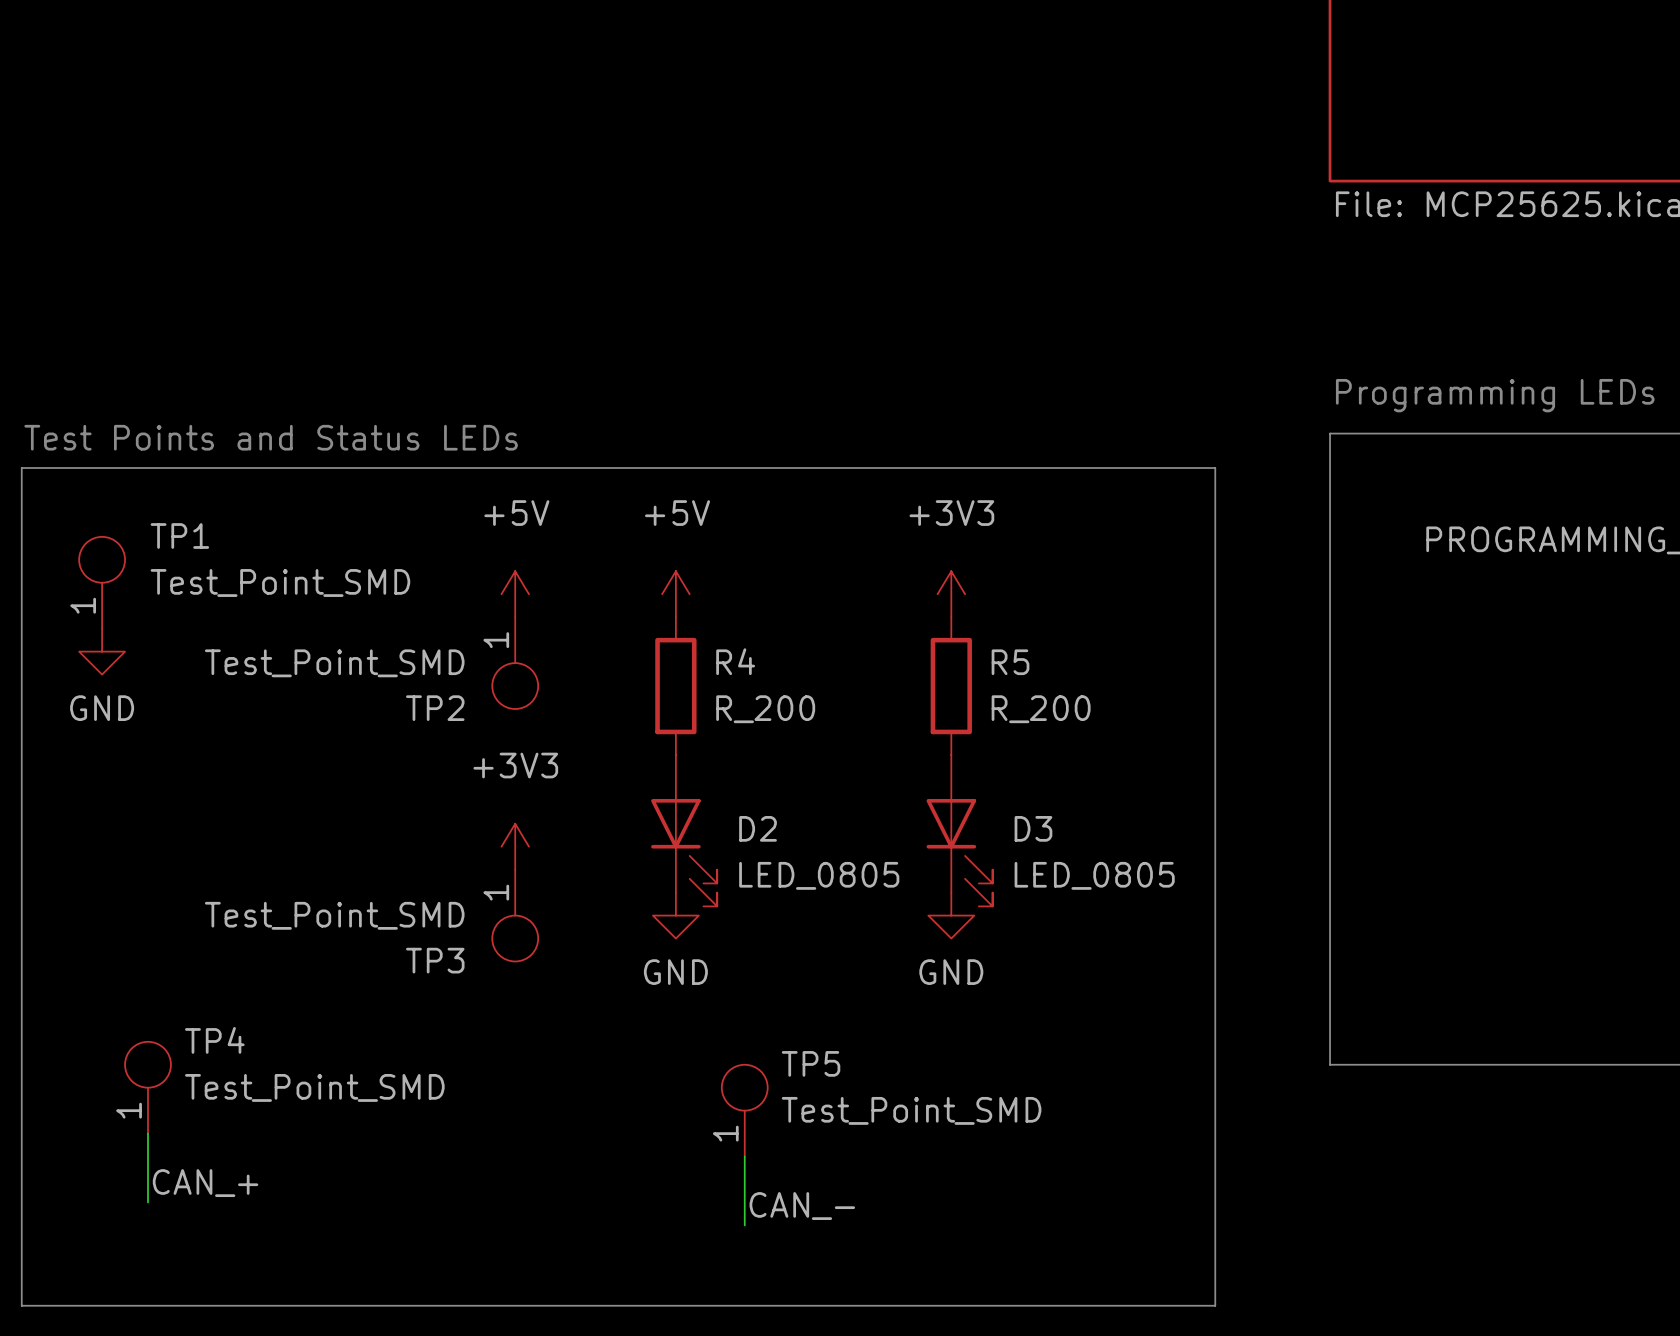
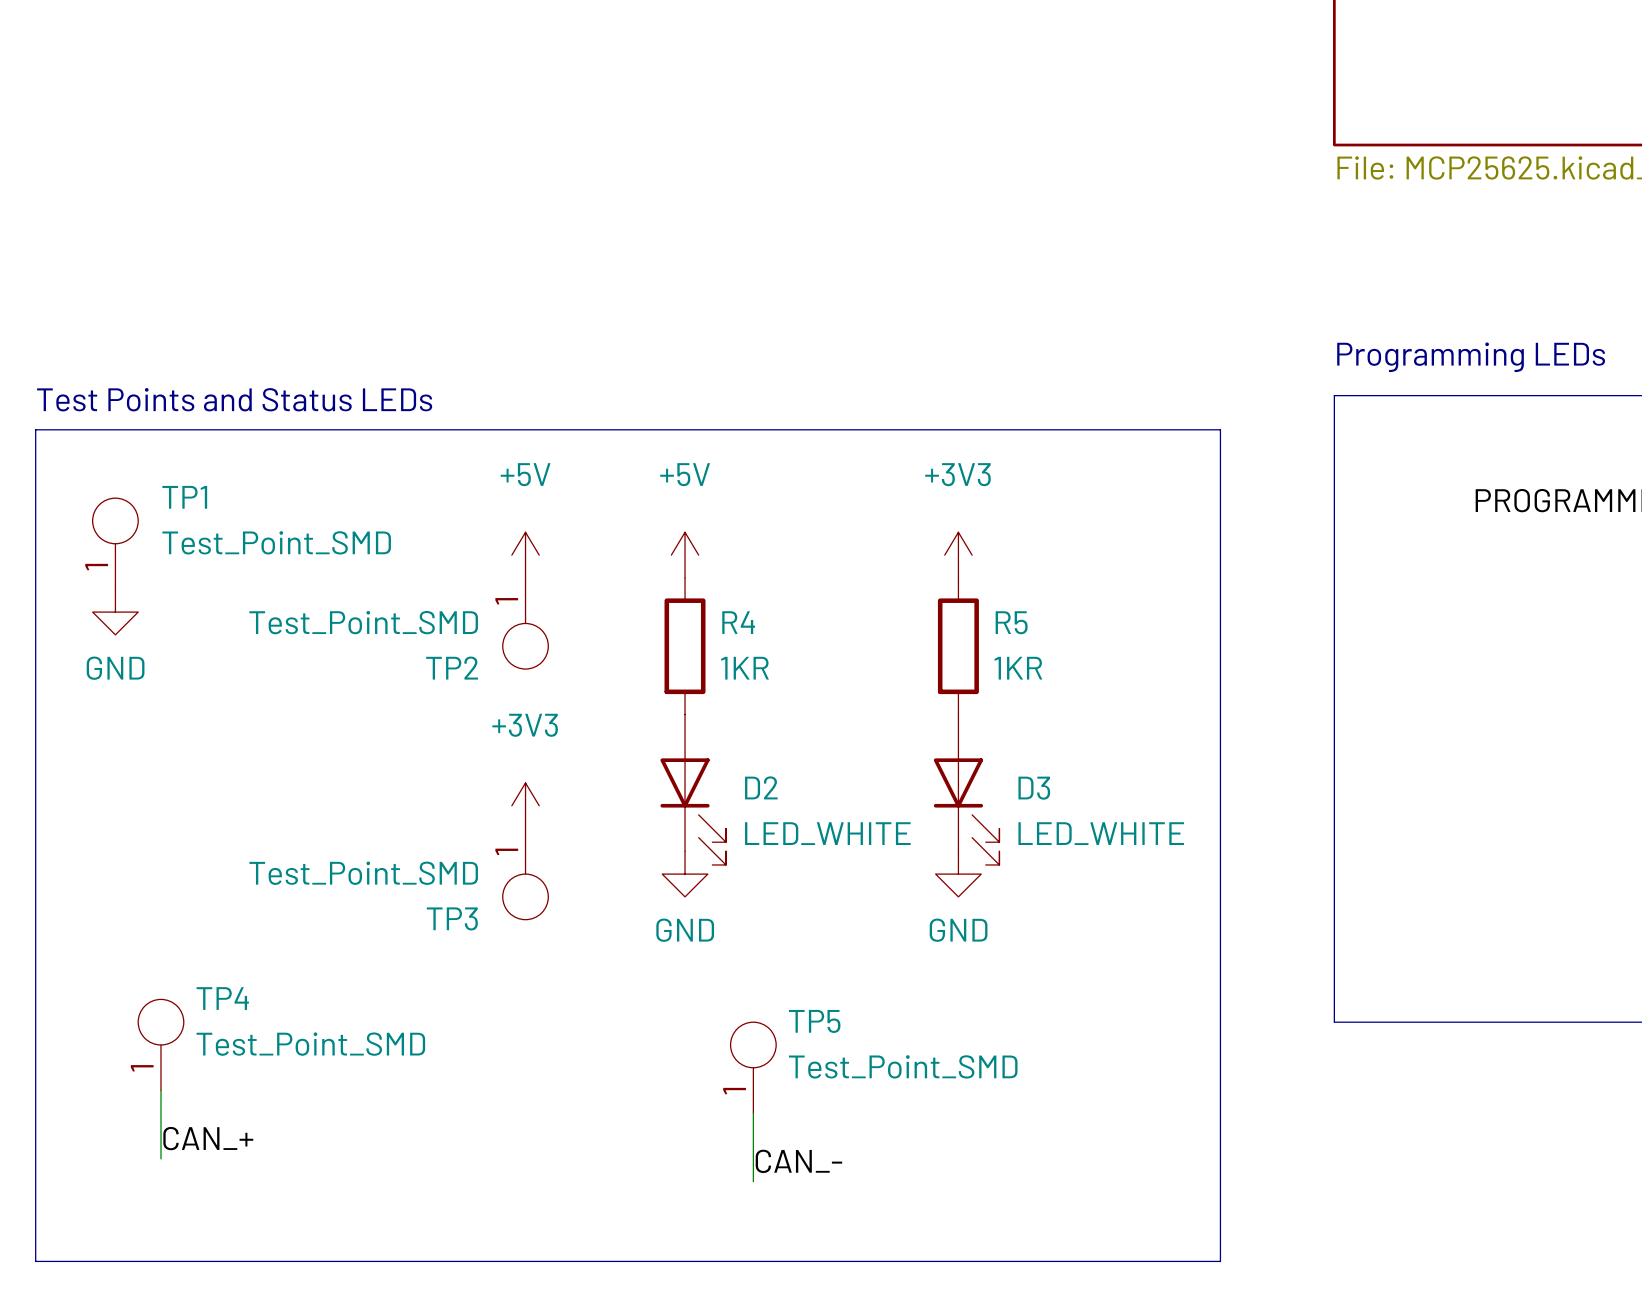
R4 value: R_200 (765, 709) -> 1KR (744, 668)
R5 value: R_200 (1041, 709) -> 1KR (1018, 668)
D2 value: LED_0805 (819, 875) -> LED_WHITE (827, 833)
D3 value: LED_0805 (1094, 875) -> LED_WHITE (1101, 833)

